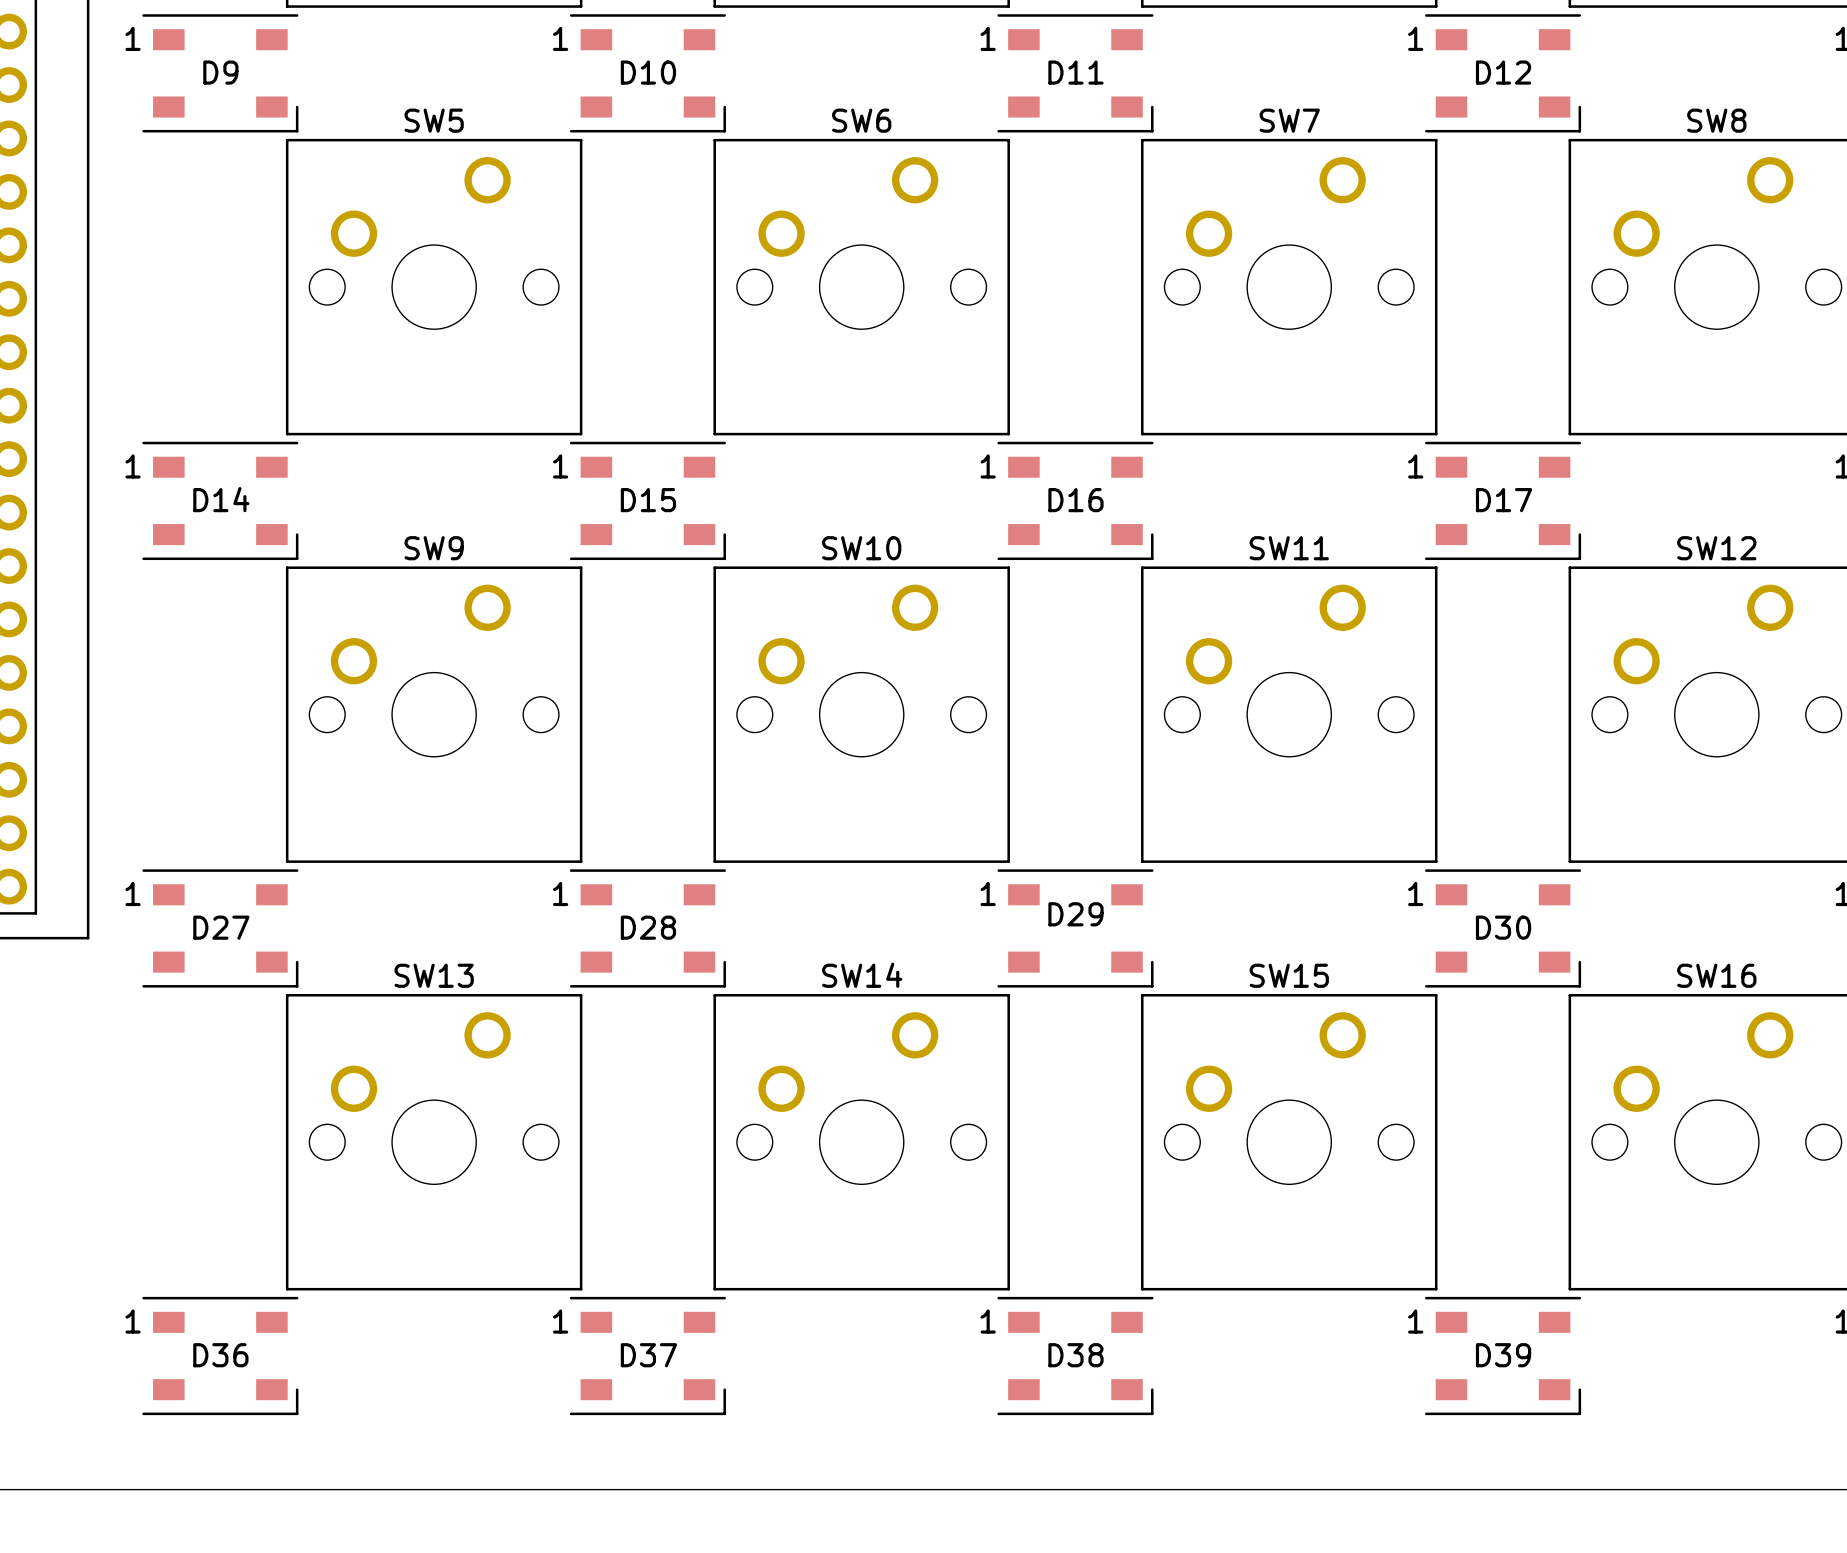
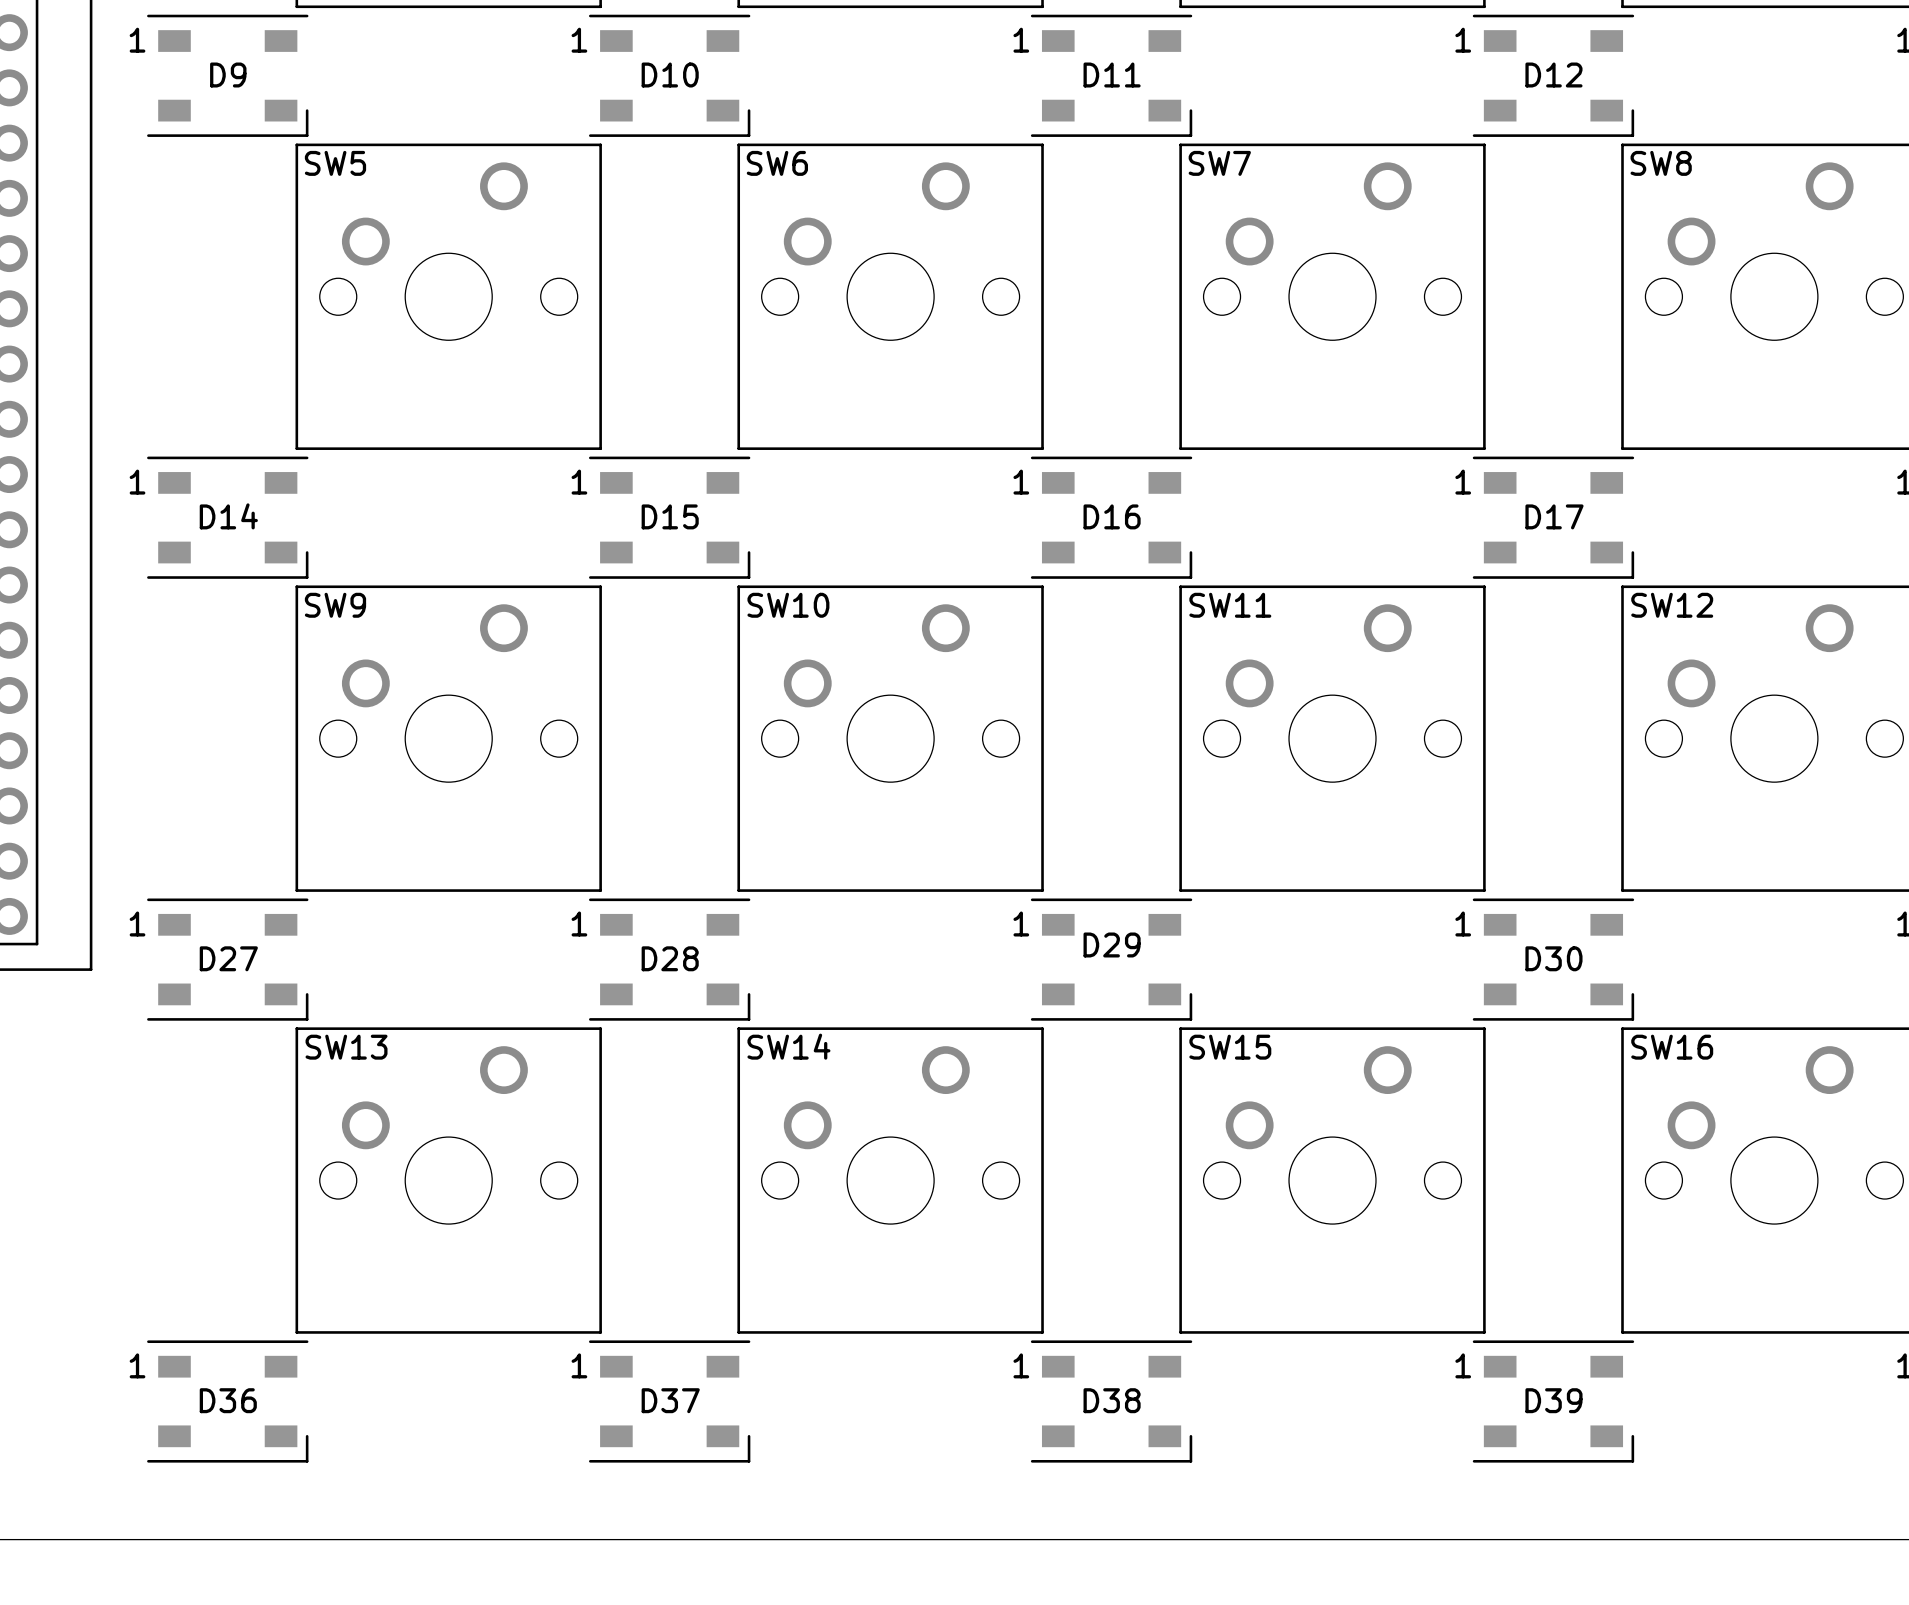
SW5 name position: SW5 (434, 120) -> SW5 (335, 163)
SW6 name position: SW6 (861, 120) -> SW6 (777, 163)
SW7 name position: SW7 (1289, 120) -> SW7 (1219, 163)
SW8 name position: SW8 (1716, 120) -> SW8 (1661, 163)
SW9 name position: SW9 (434, 548) -> SW9 (335, 605)
SW10 name position: SW10 (861, 548) -> SW10 (788, 605)
SW11 name position: SW11 (1289, 548) -> SW11 (1230, 605)
SW12 name position: SW12 (1716, 548) -> SW12 (1672, 605)
SW13 name position: SW13 (434, 975) -> SW13 (346, 1047)
SW14 name position: SW14 (862, 975) -> SW14 (788, 1046)
SW15 name position: SW15 (1289, 975) -> SW15 (1230, 1047)
SW16 name position: SW16 (1716, 975) -> SW16 (1672, 1047)

